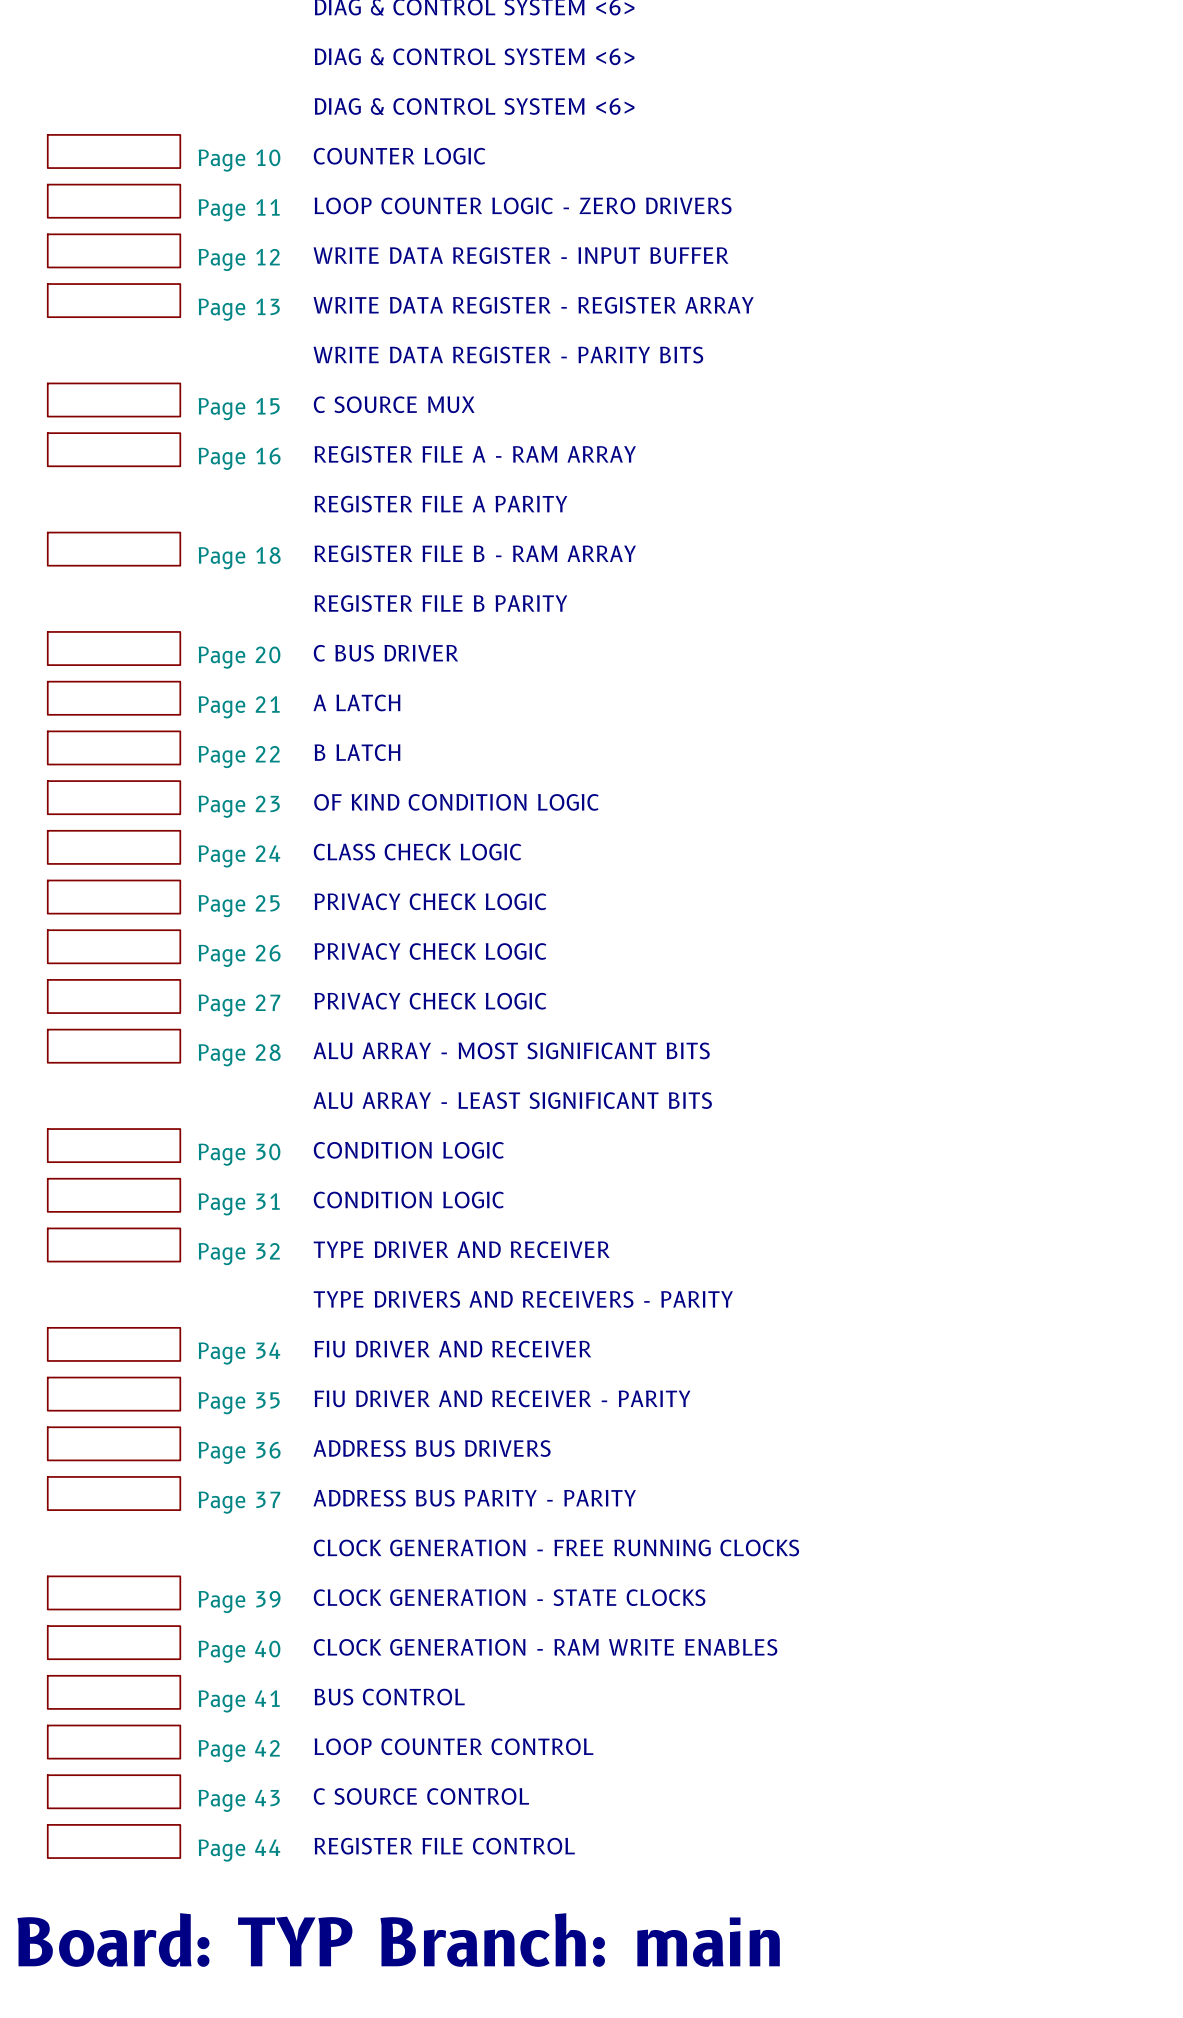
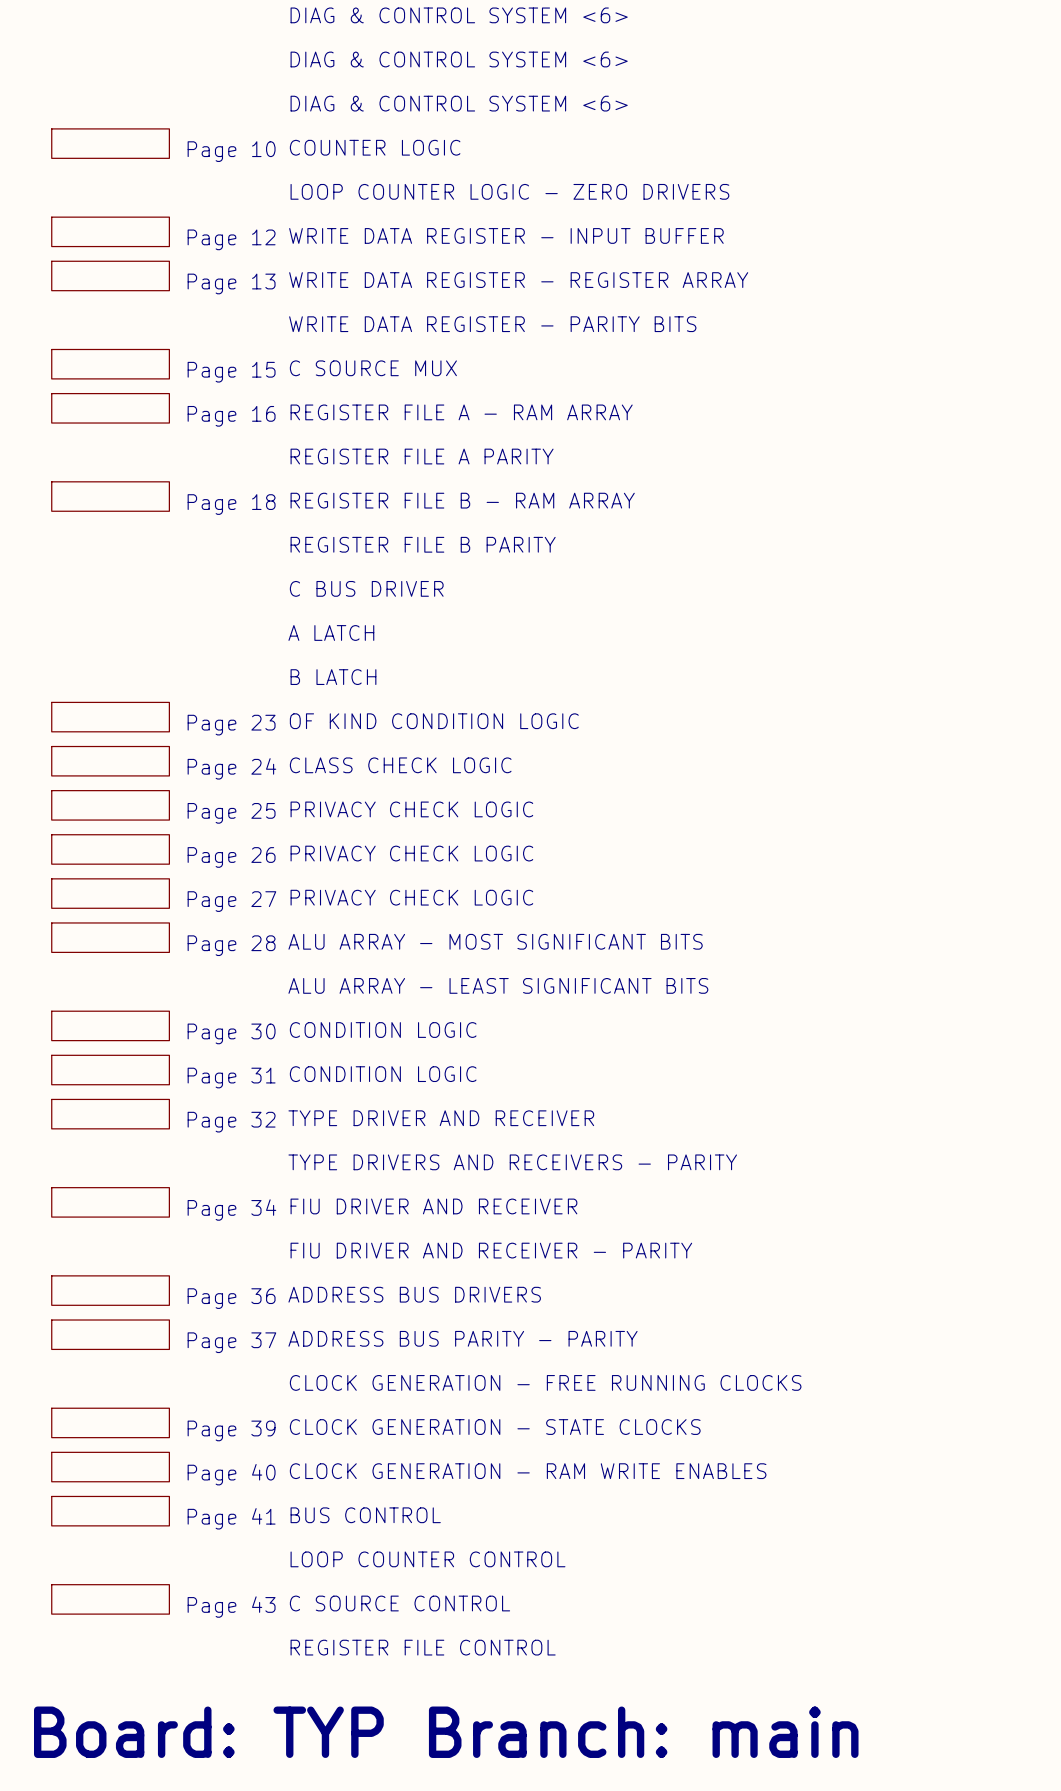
sheet Page 11: (114, 201) -> none
sheet Page 20: (114, 648) -> none
sheet Page 21: (114, 698) -> none
sheet Page 22: (114, 747) -> none
sheet Page 35: (114, 1394) -> none
sheet Page 42: (114, 1742) -> none
sheet Page 44: (114, 1841) -> none

